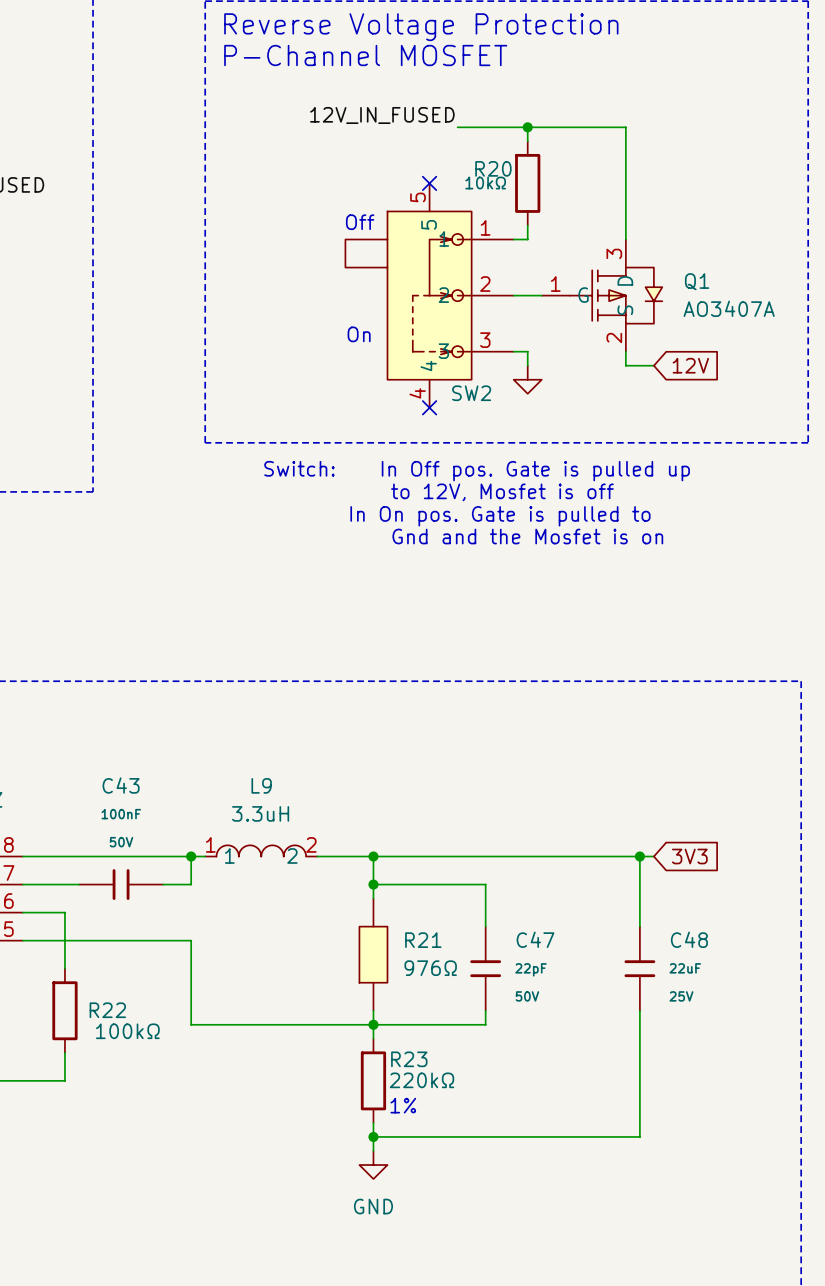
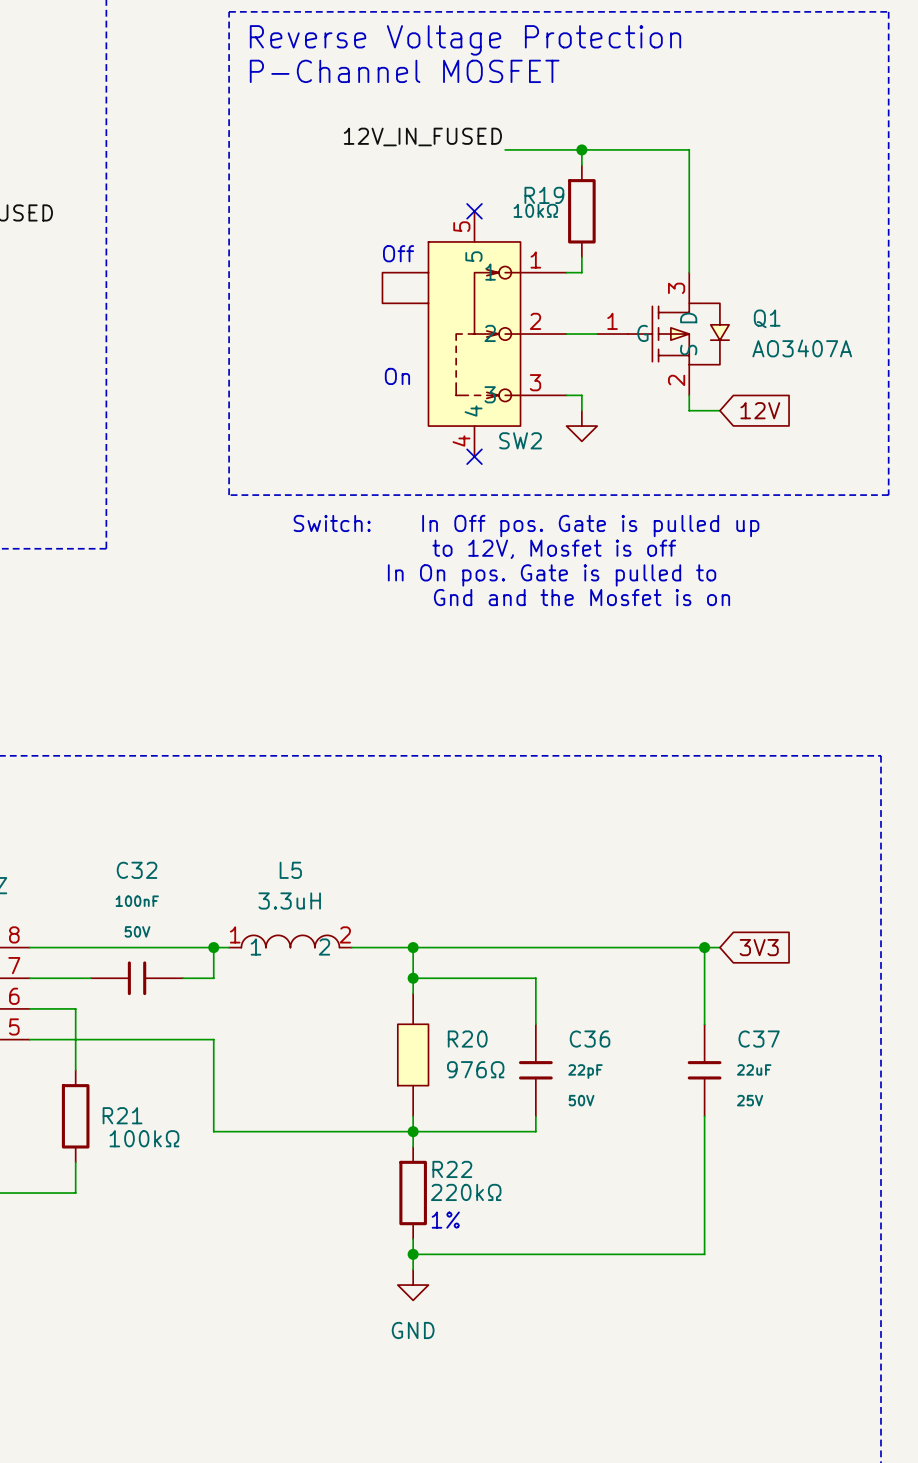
R20 name: R20 (493, 168) -> R19 (544, 195)
C43 name: C43 (121, 785) -> C32 (137, 870)
L9 name: L9 (261, 785) -> L5 (290, 870)
C47 name: C47 (535, 939) -> C36 (590, 1039)
C48 name: C48 (689, 939) -> C37 (759, 1039)
R21 name: R21 (423, 940) -> R20 (467, 1039)
R22 name: R22 (107, 1010) -> R21 (122, 1115)
R23 name: R23 (409, 1059) -> R22 (452, 1169)

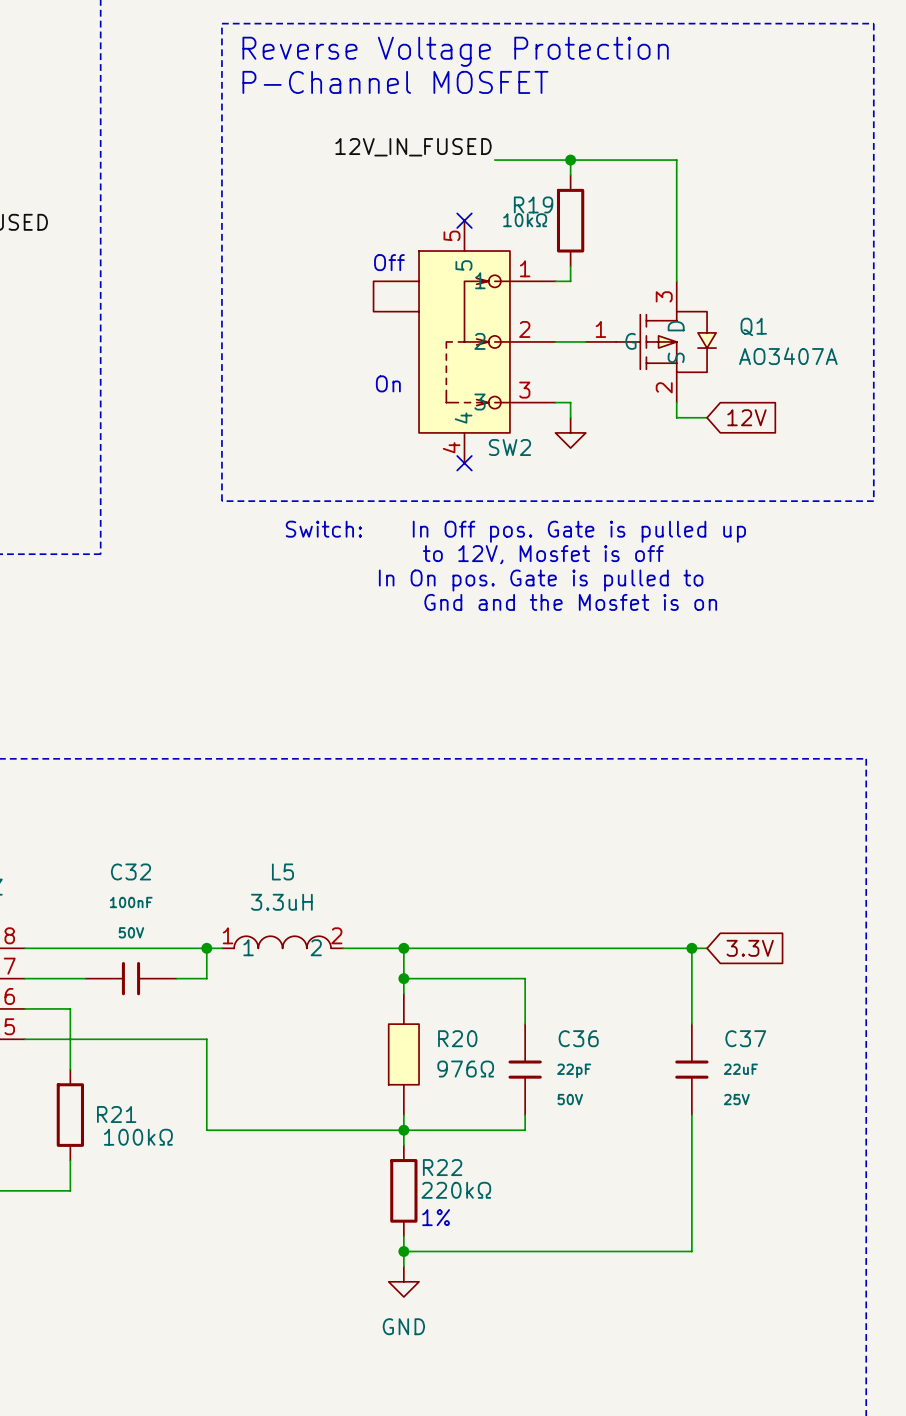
global label: 3V3 (759, 947) -> 3.3V (750, 948)

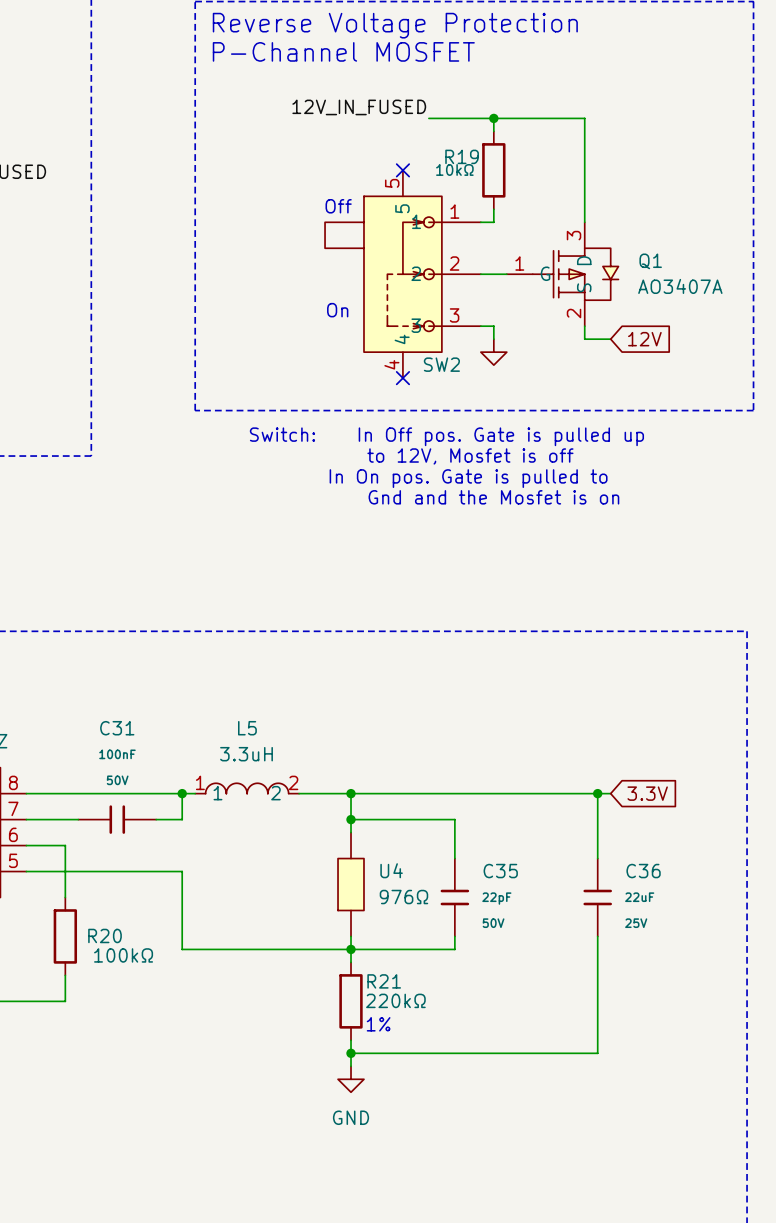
C32 name: C32 (131, 871) -> C31 (117, 728)
R20 name: R20 (457, 1038) -> U4 (391, 870)
C36 name: C36 (578, 1038) -> C35 (500, 871)
C37 name: C37 (745, 1038) -> C36 (643, 871)
R21 name: R21 (116, 1114) -> R20 (105, 935)
R22 name: R22 (442, 1167) -> R21 (384, 981)

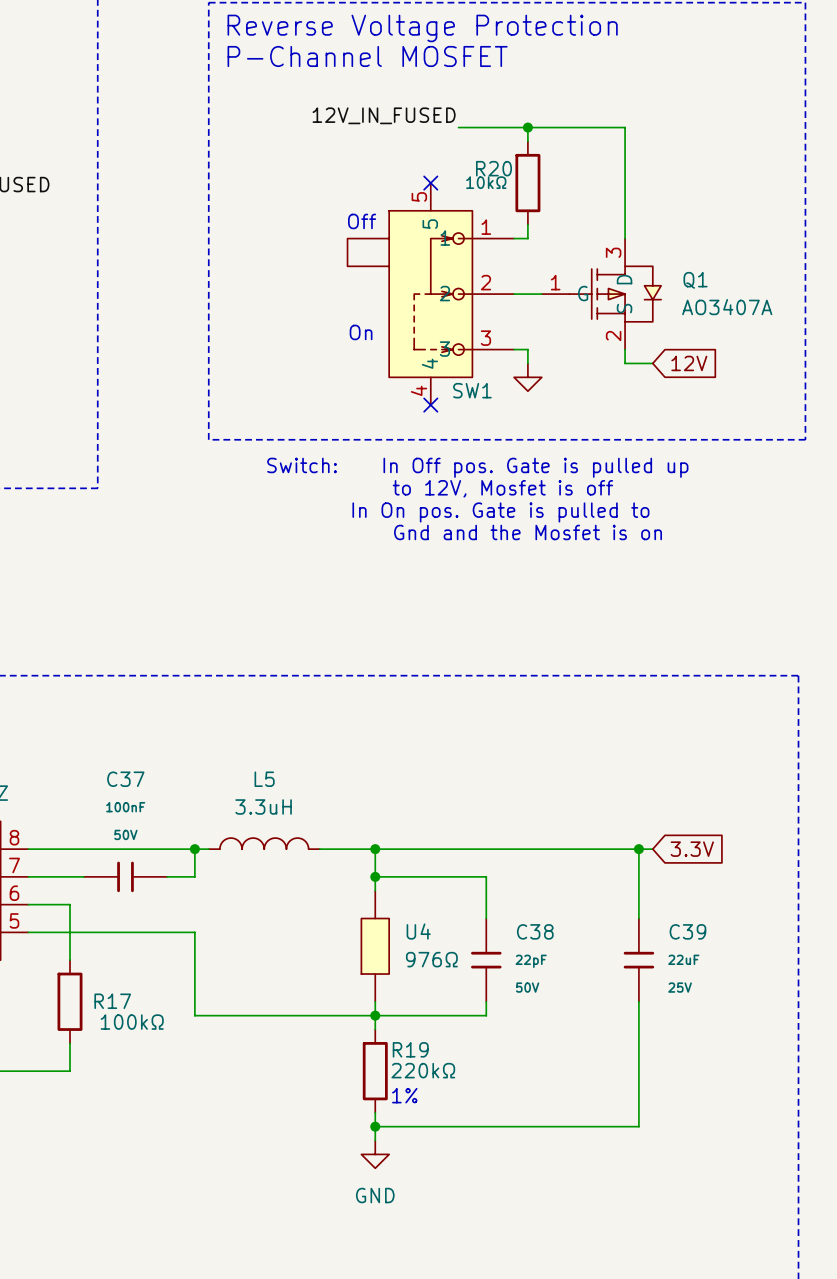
R19 name: R19 (462, 156) -> R20 (493, 168)
SW2 name: SW2 (441, 364) -> SW1 (472, 390)
C31 name: C31 (117, 728) -> C37 (125, 779)
L5 pin number: 1 (200, 782) -> none
L5 pin number: 2 (293, 782) -> none
L5 pin name: 1 (217, 793) -> none
L5 pin name: 2 (275, 793) -> none
C35 name: C35 (500, 871) -> C38 (535, 931)
C36 name: C36 (643, 871) -> C39 (687, 931)
R20 name: R20 (105, 935) -> R17 (112, 1001)
R21 name: R21 (384, 981) -> R19 (410, 1049)

